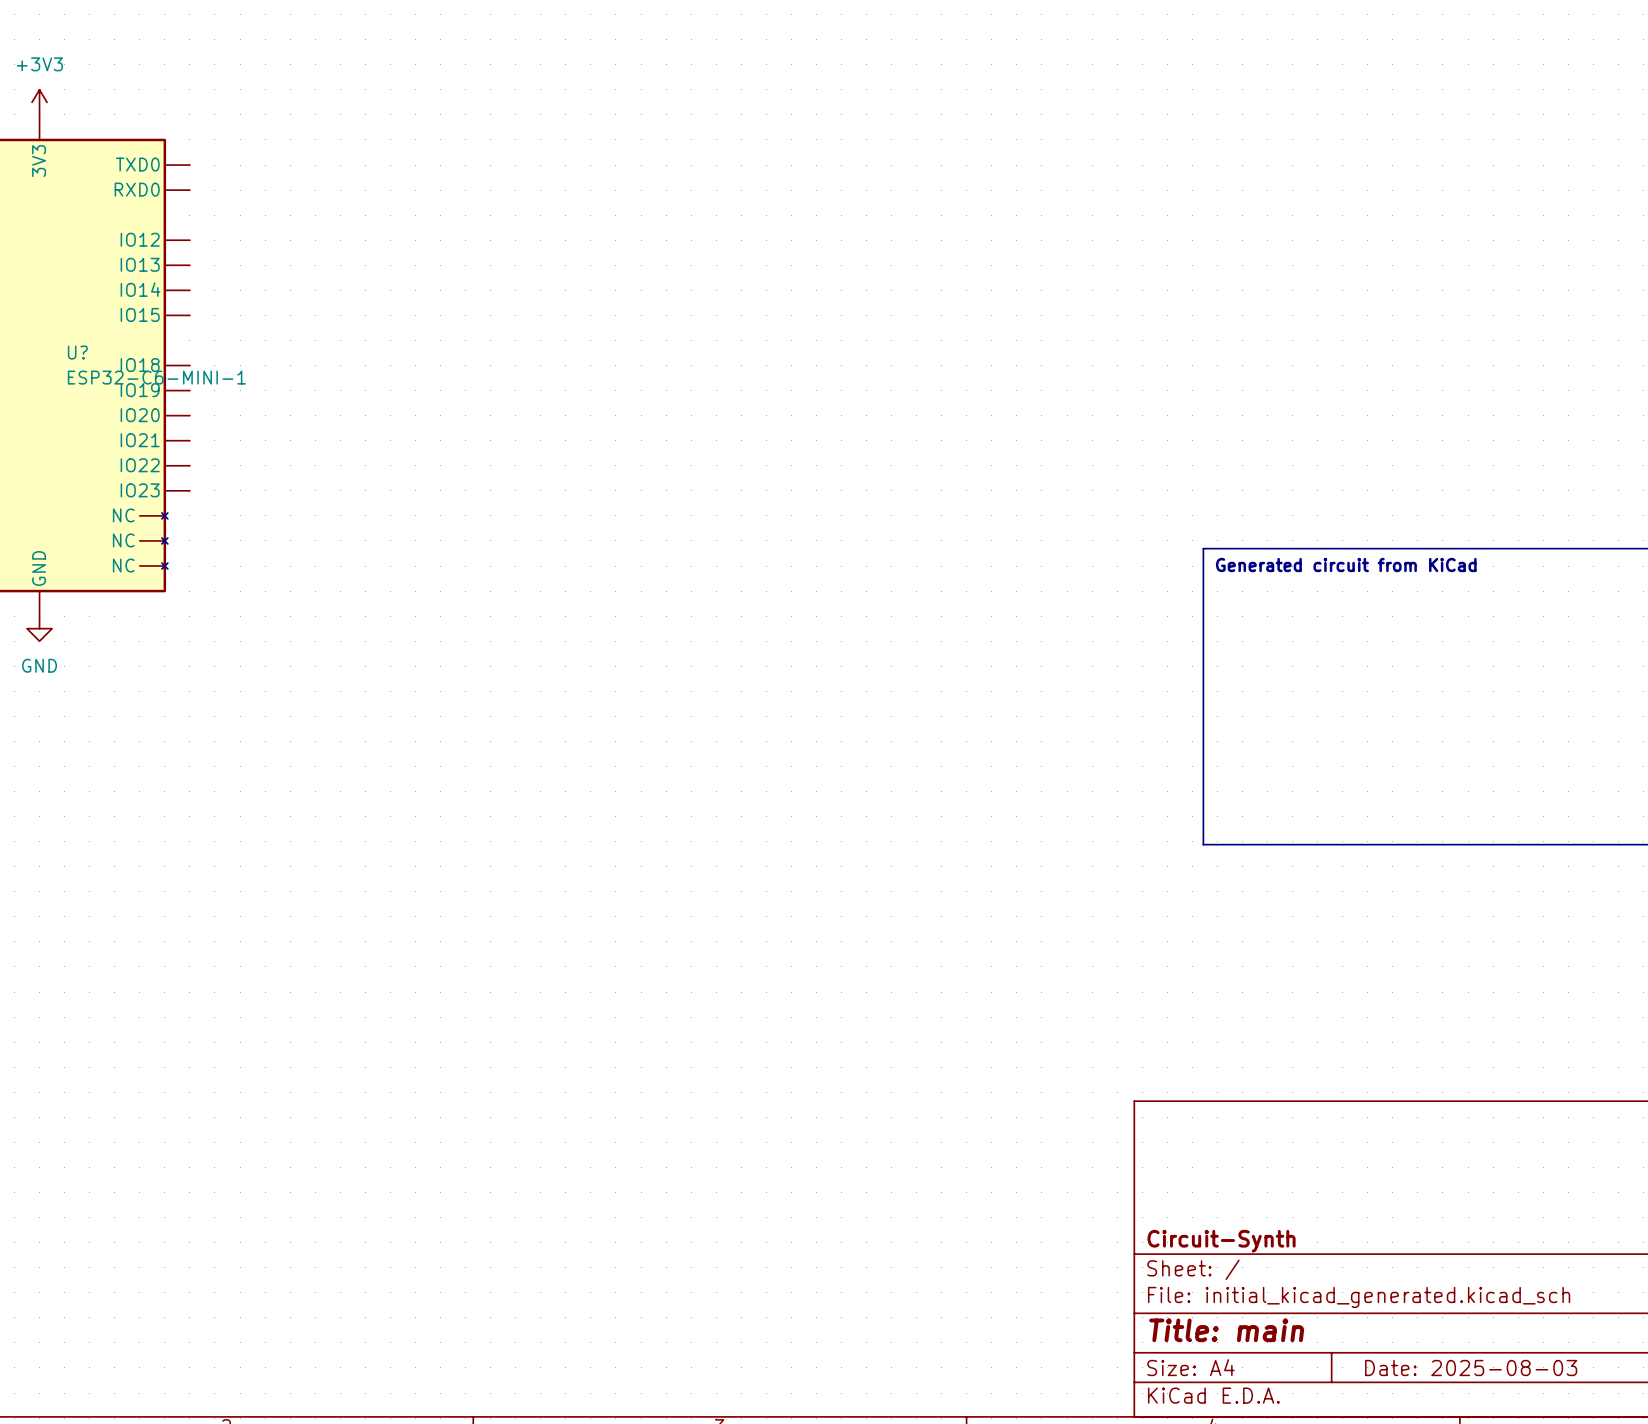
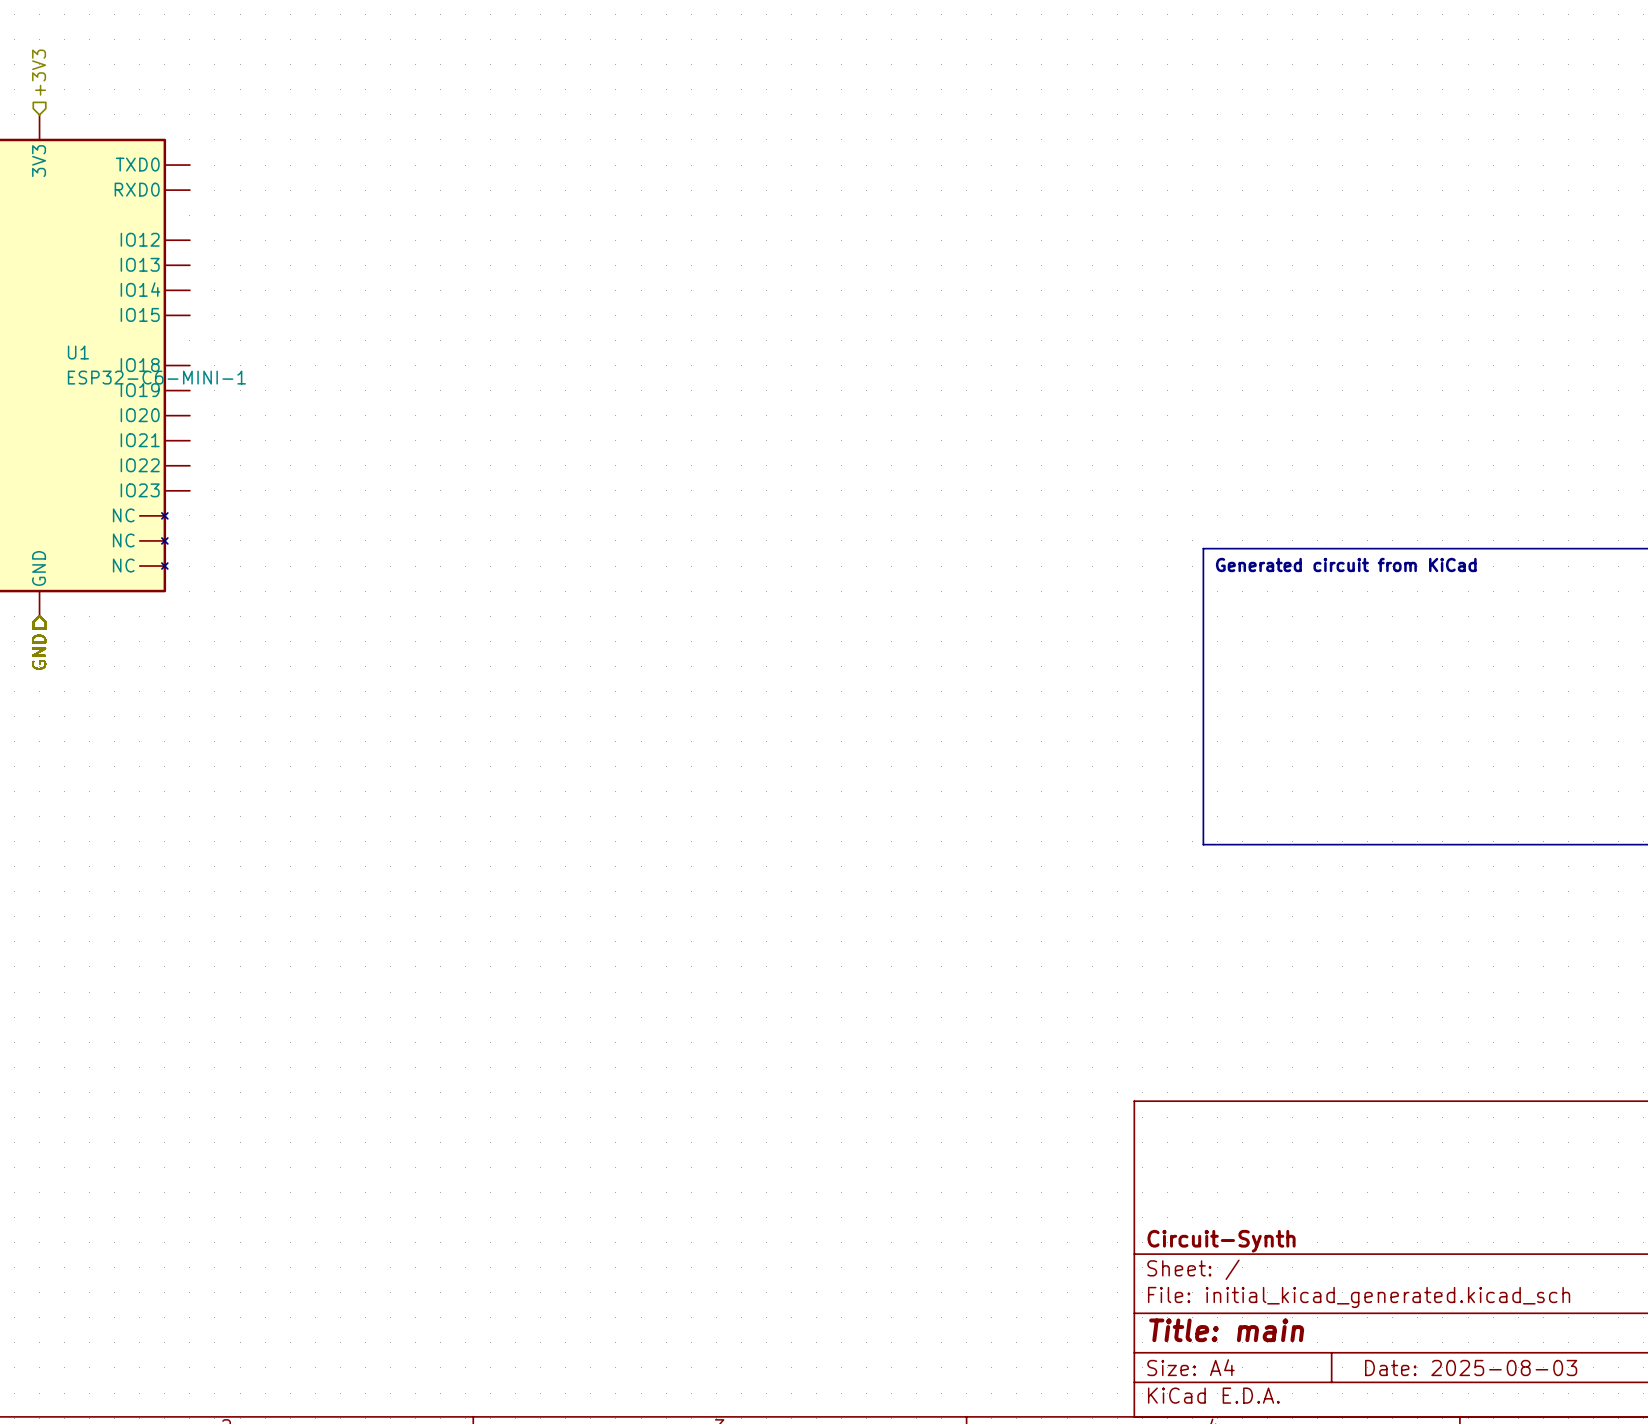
hierarchical label: none -> +3V3 (39, 72)
power symbol: +3V3 (39, 102) -> none
U? name: U? (77, 352) -> U1 (78, 352)
power symbol: GND (39, 628) -> none
hierarchical label: none -> GND (39, 652)

